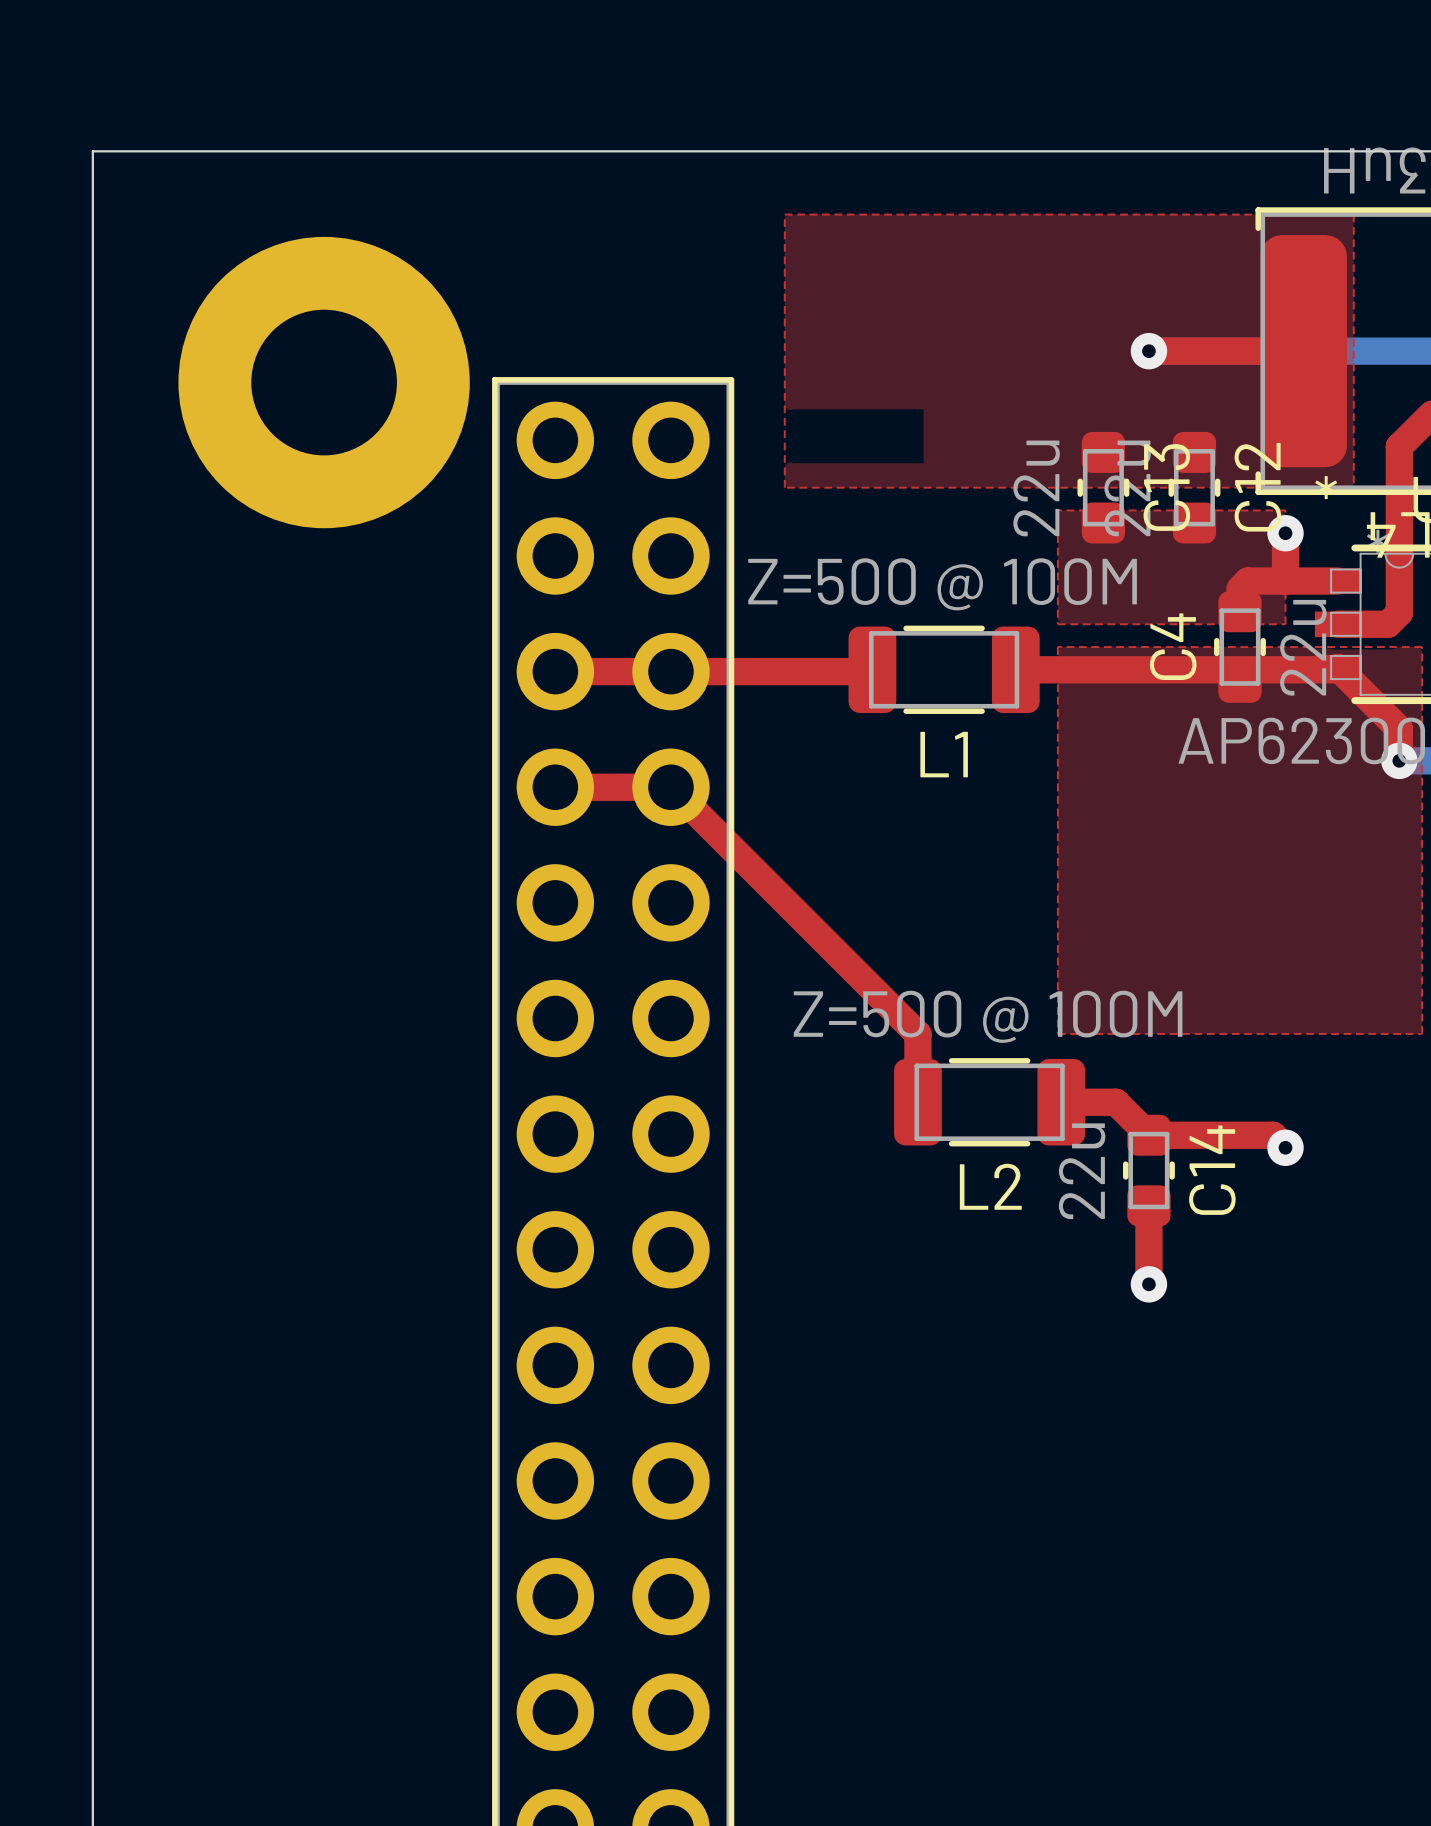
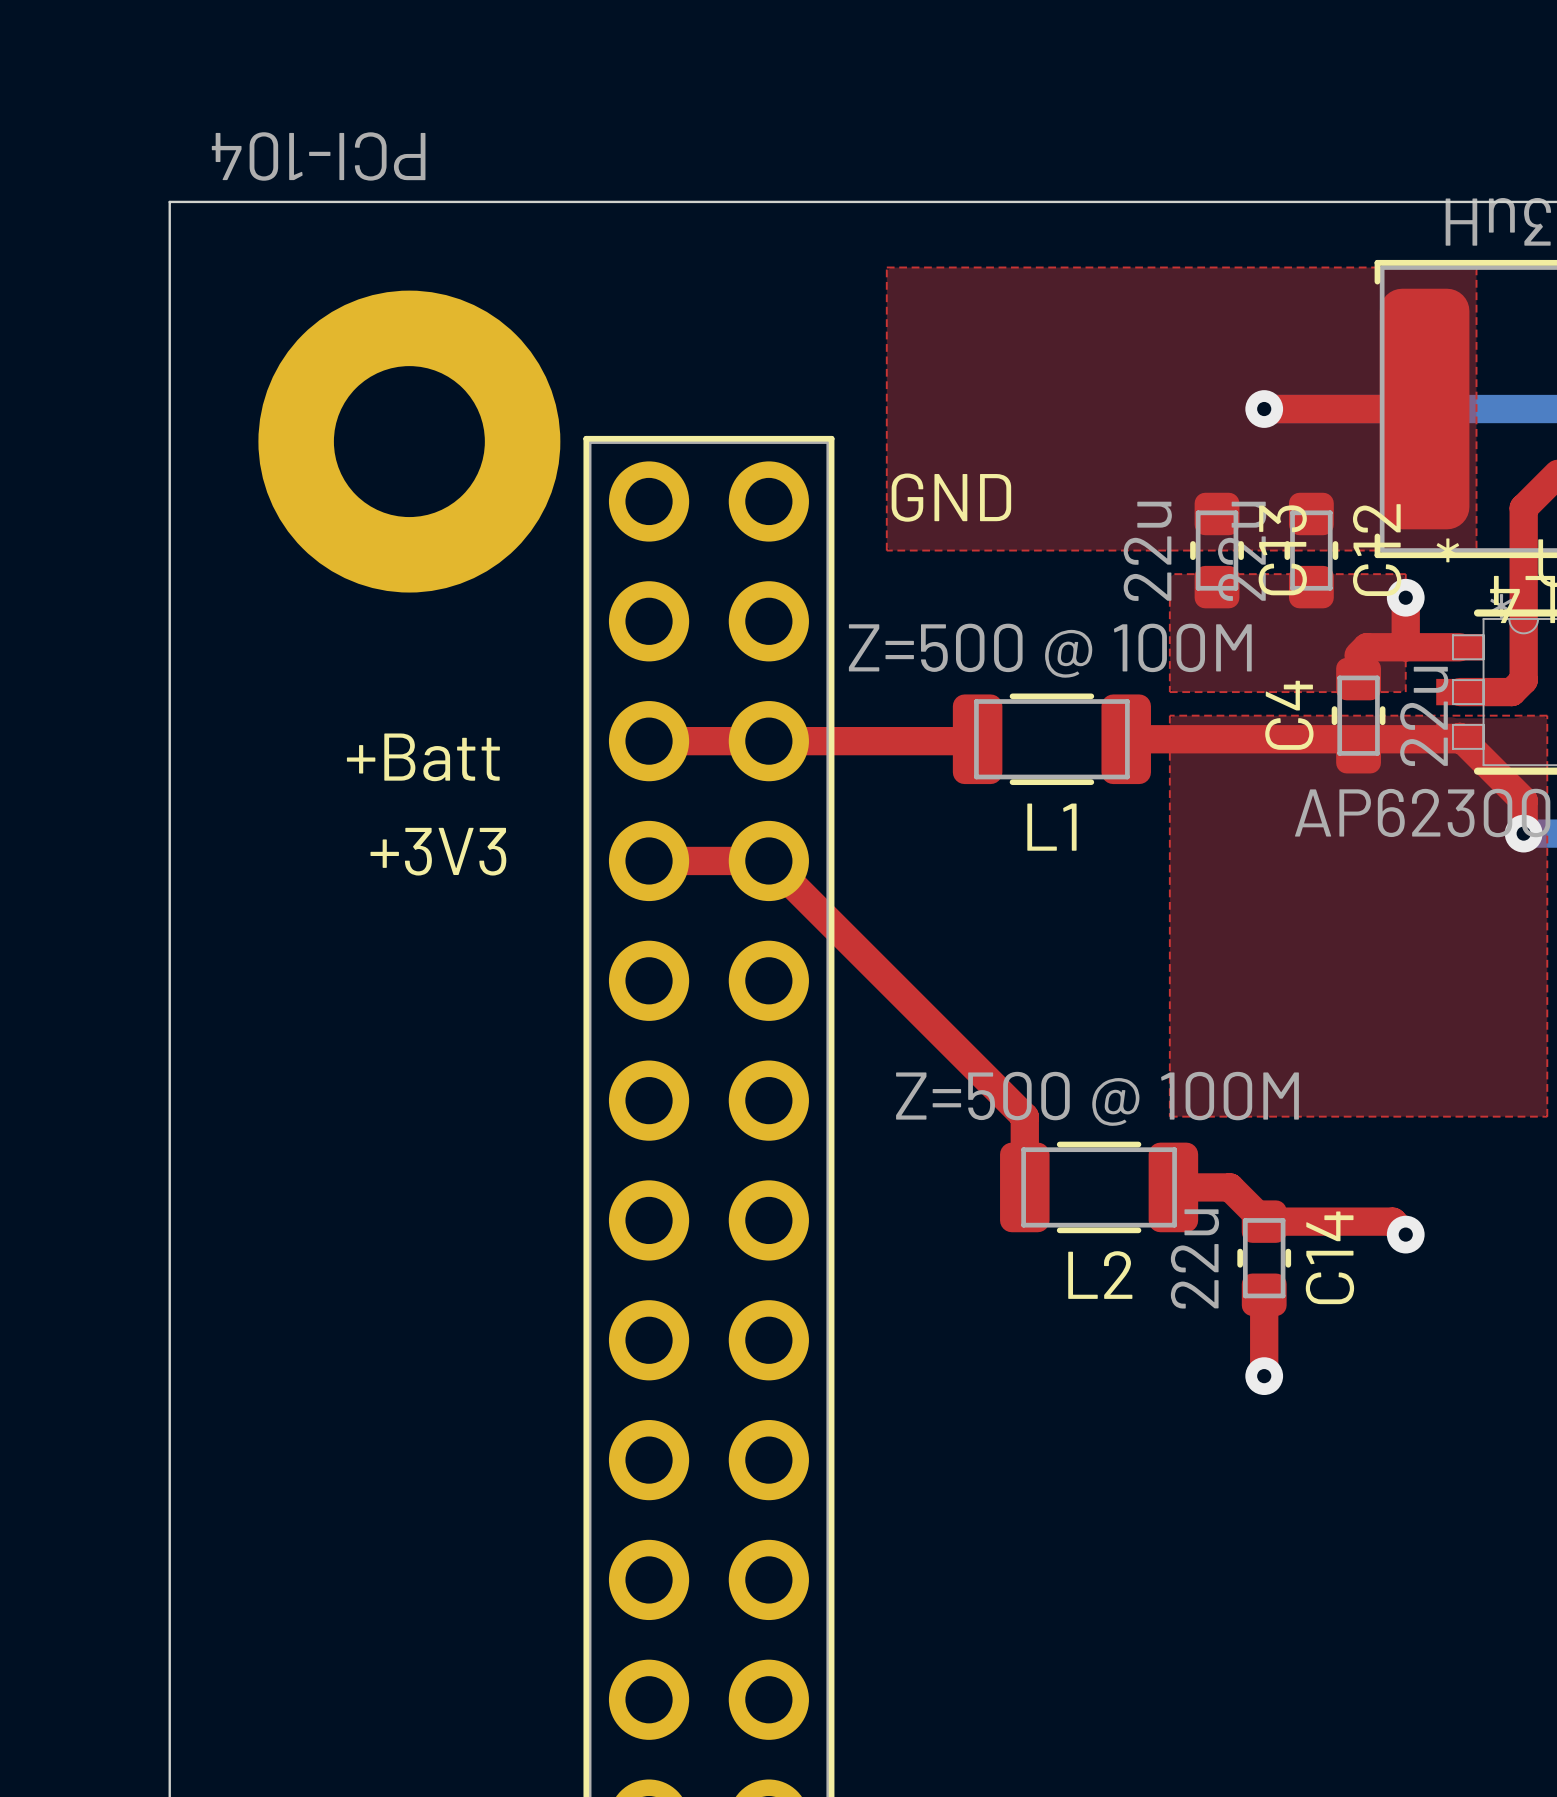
part value: none -> PCI-104 (318, 156)
text: none -> GND (951, 497)
text: none -> +Batt (423, 757)
text: none -> +3V3 (438, 851)

